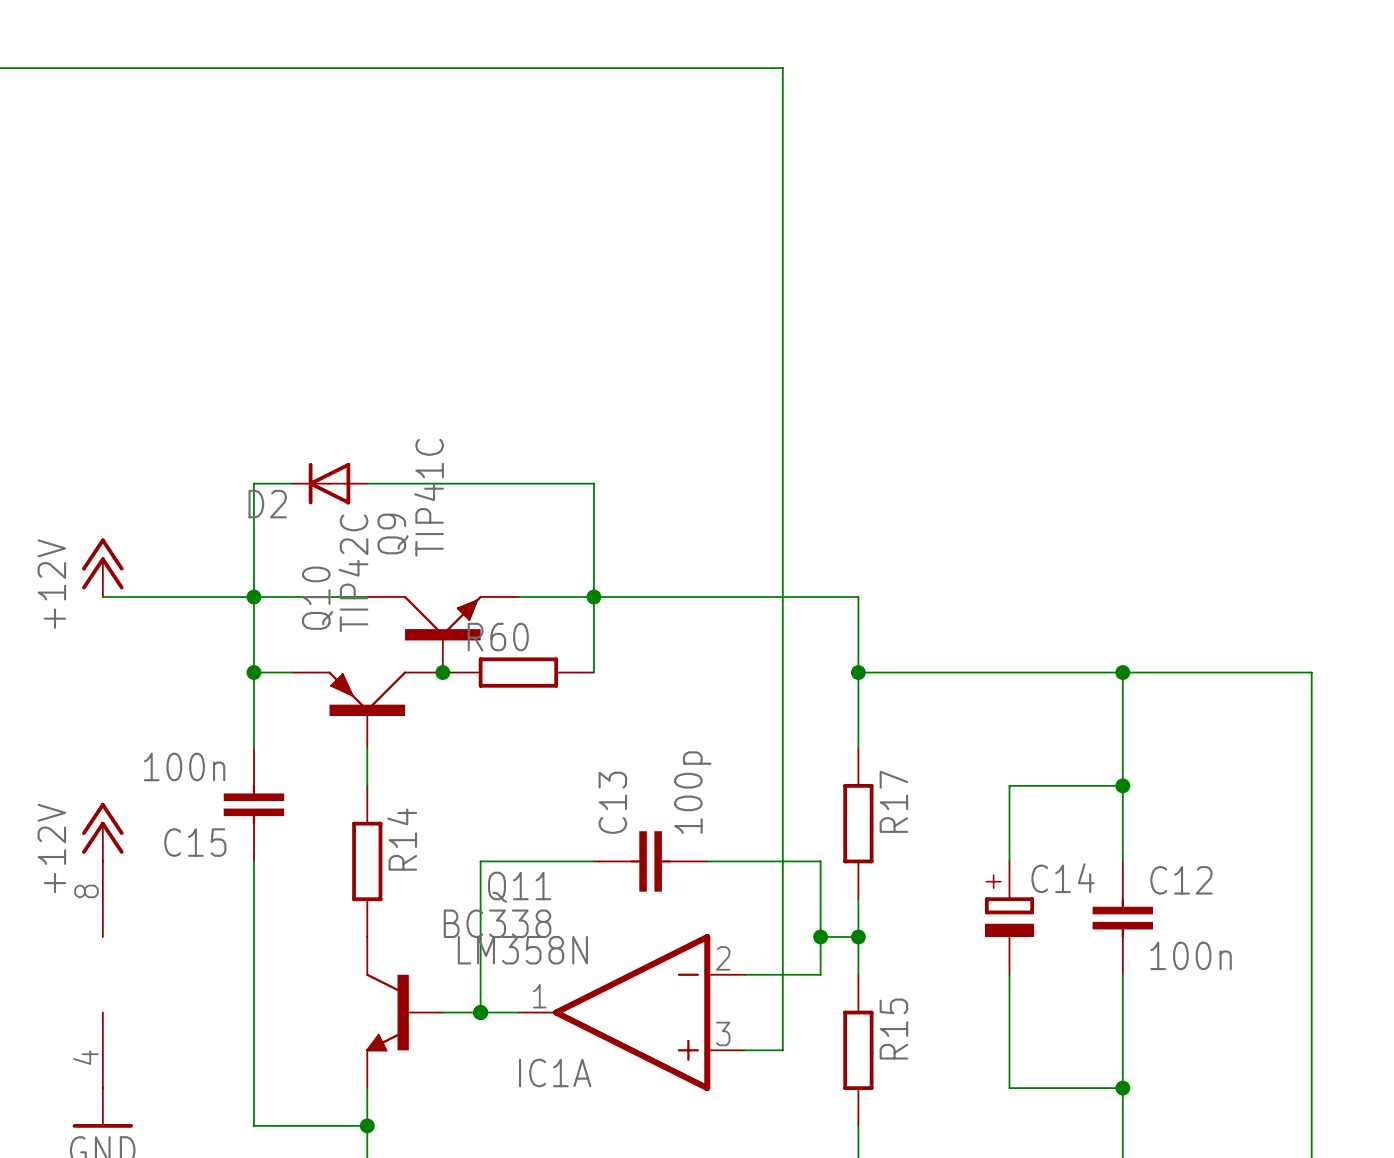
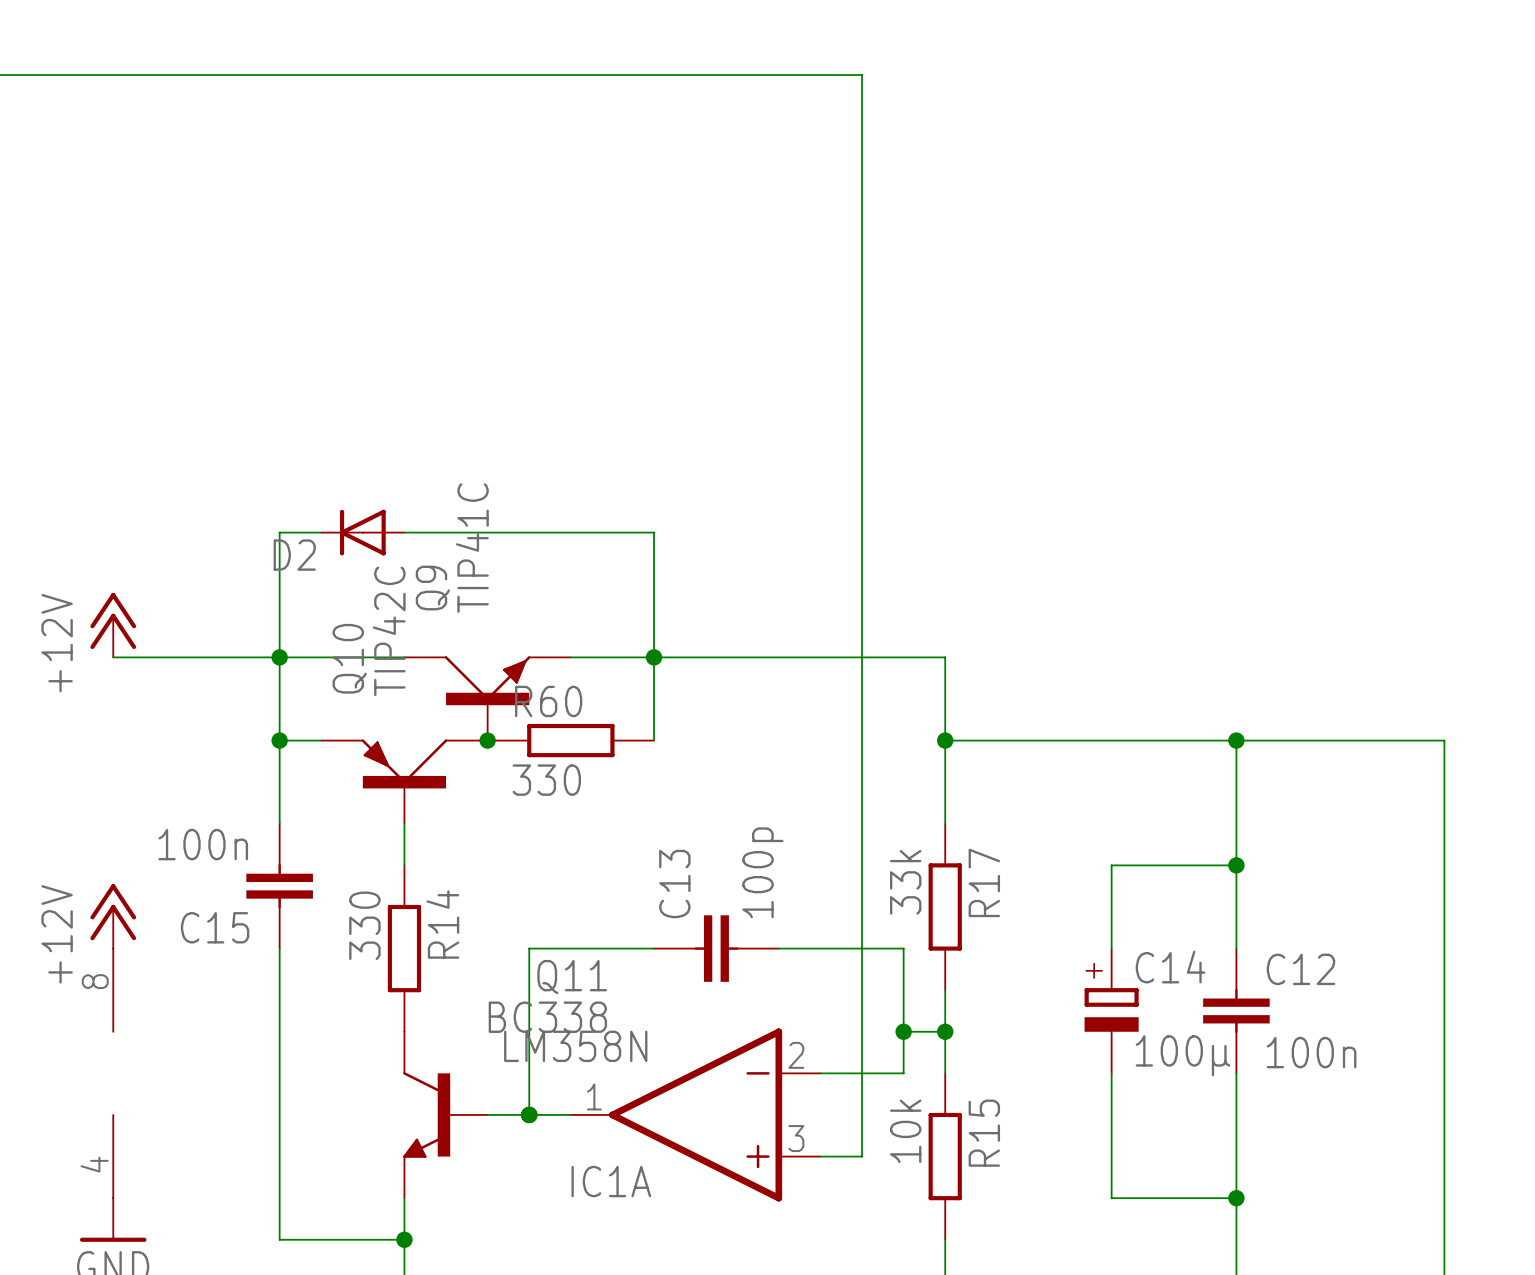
R60 value: none -> 330 (546, 780)
R17 value: none -> 33k (905, 882)
R14 value: none -> 330 (364, 925)
C14 value: none -> 100µ (1183, 1055)
R15 value: none -> 10k (905, 1131)

